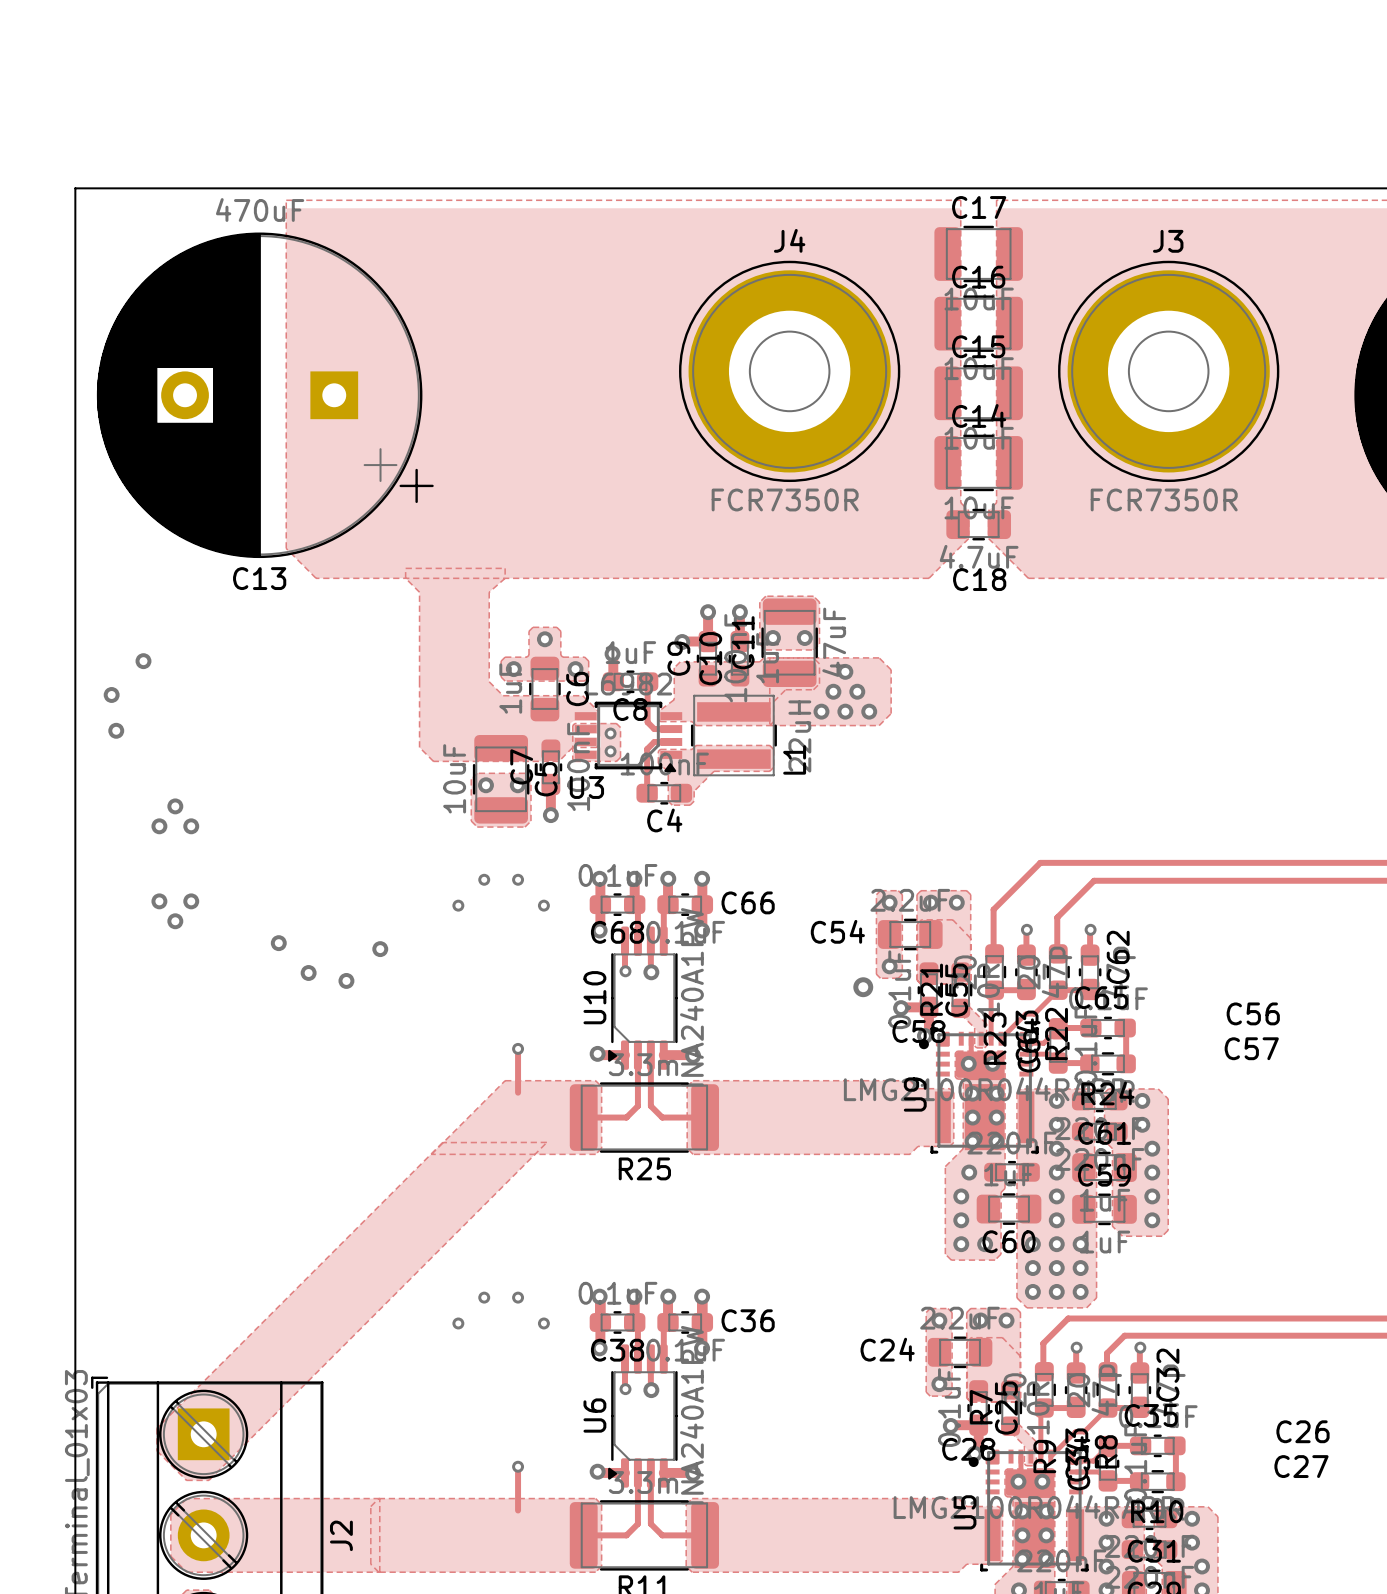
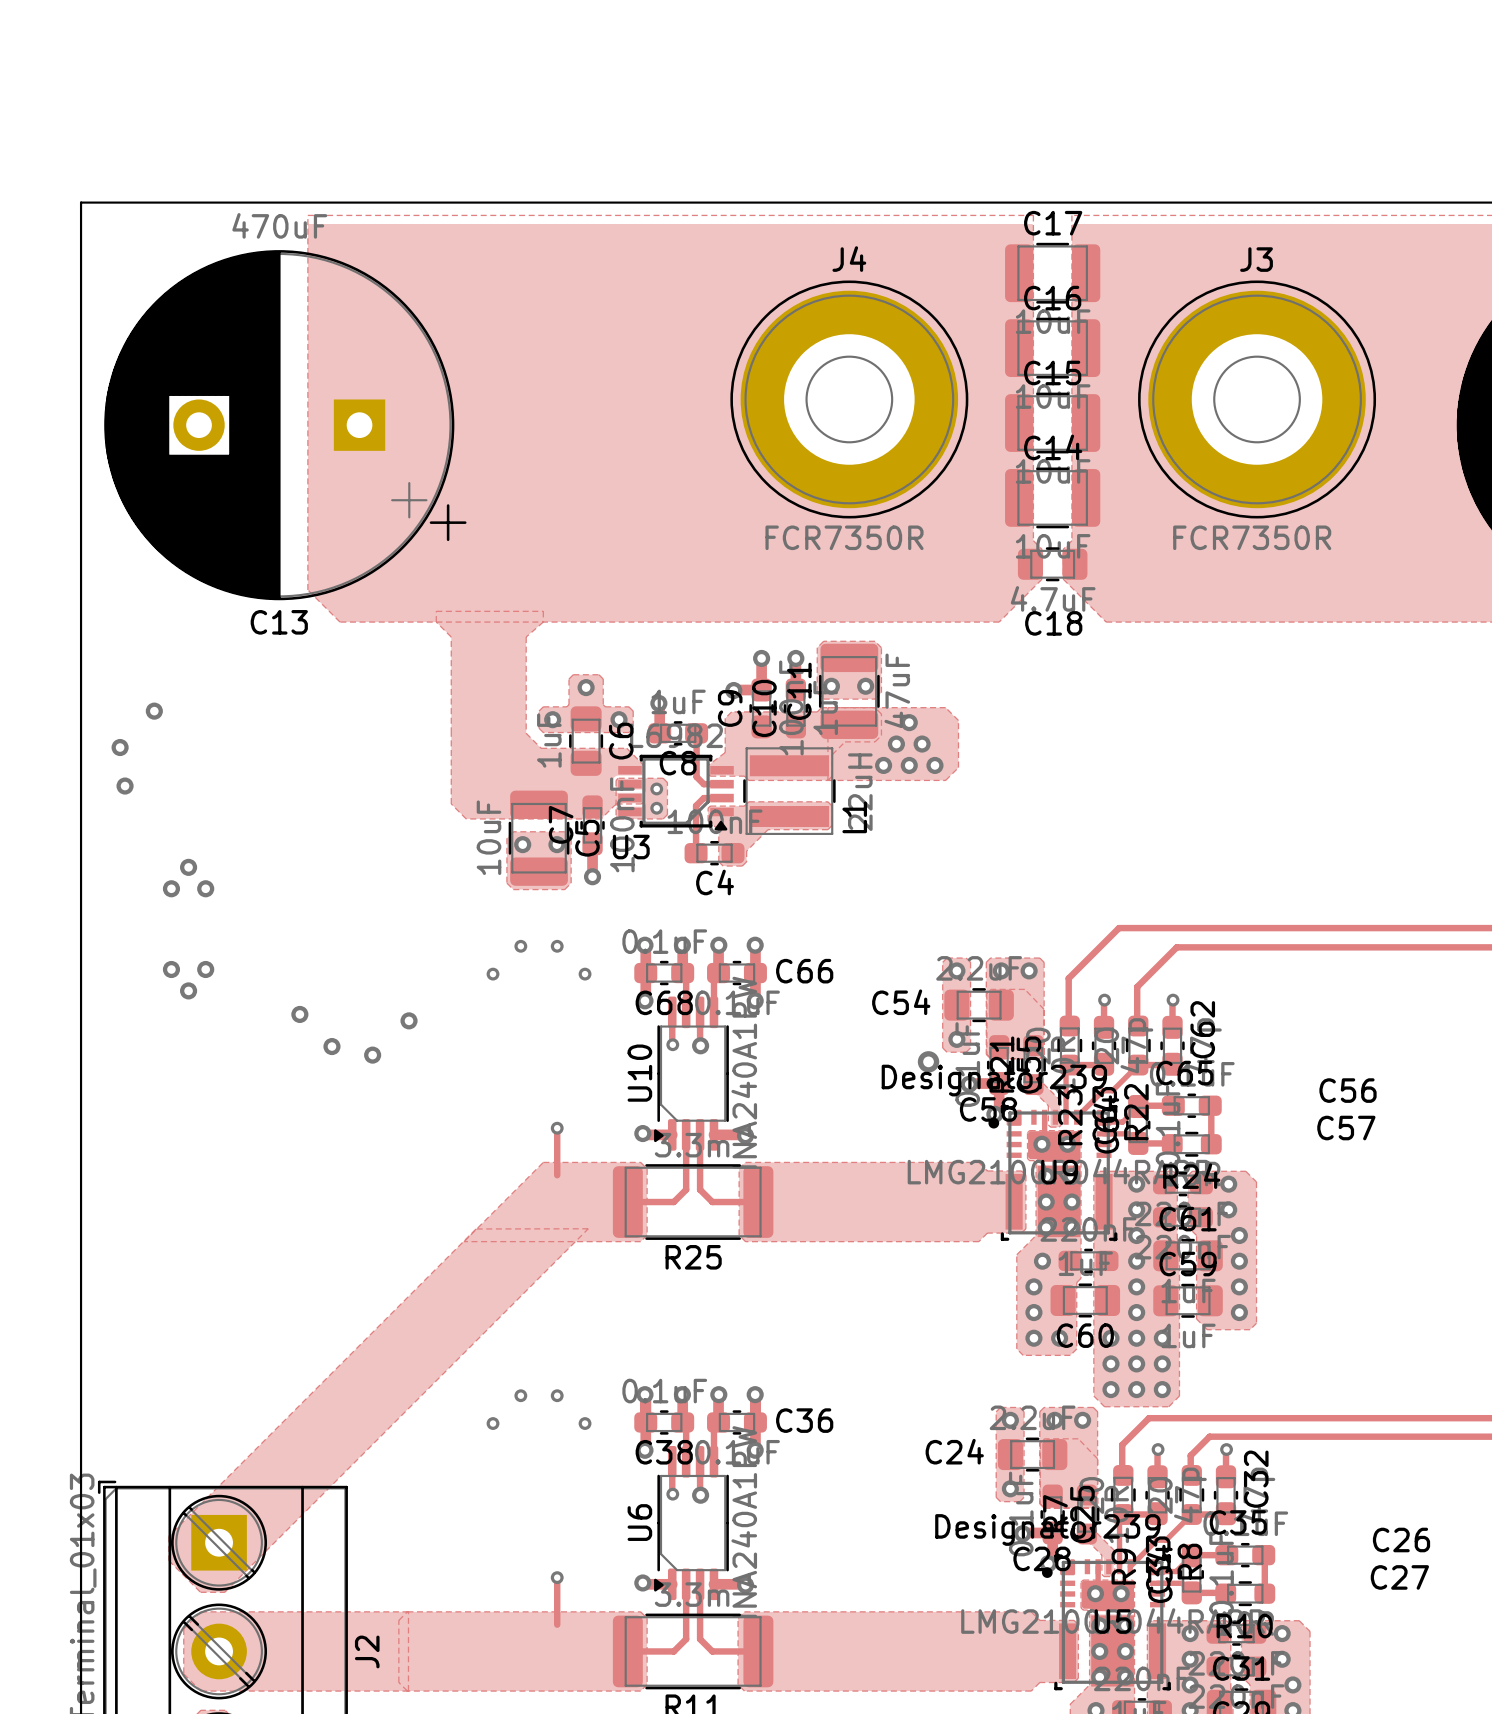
U9 footprint: [918, 1027, 1039, 1154] -> [988, 1104, 1118, 1241]
U9 name position: U9 (915, 1094) -> U9 (1059, 1172)
U5 footprint: [968, 1445, 1089, 1572] -> [1041, 1554, 1171, 1691]
U5 name position: U5 (964, 1512) -> U5 (1113, 1621)

